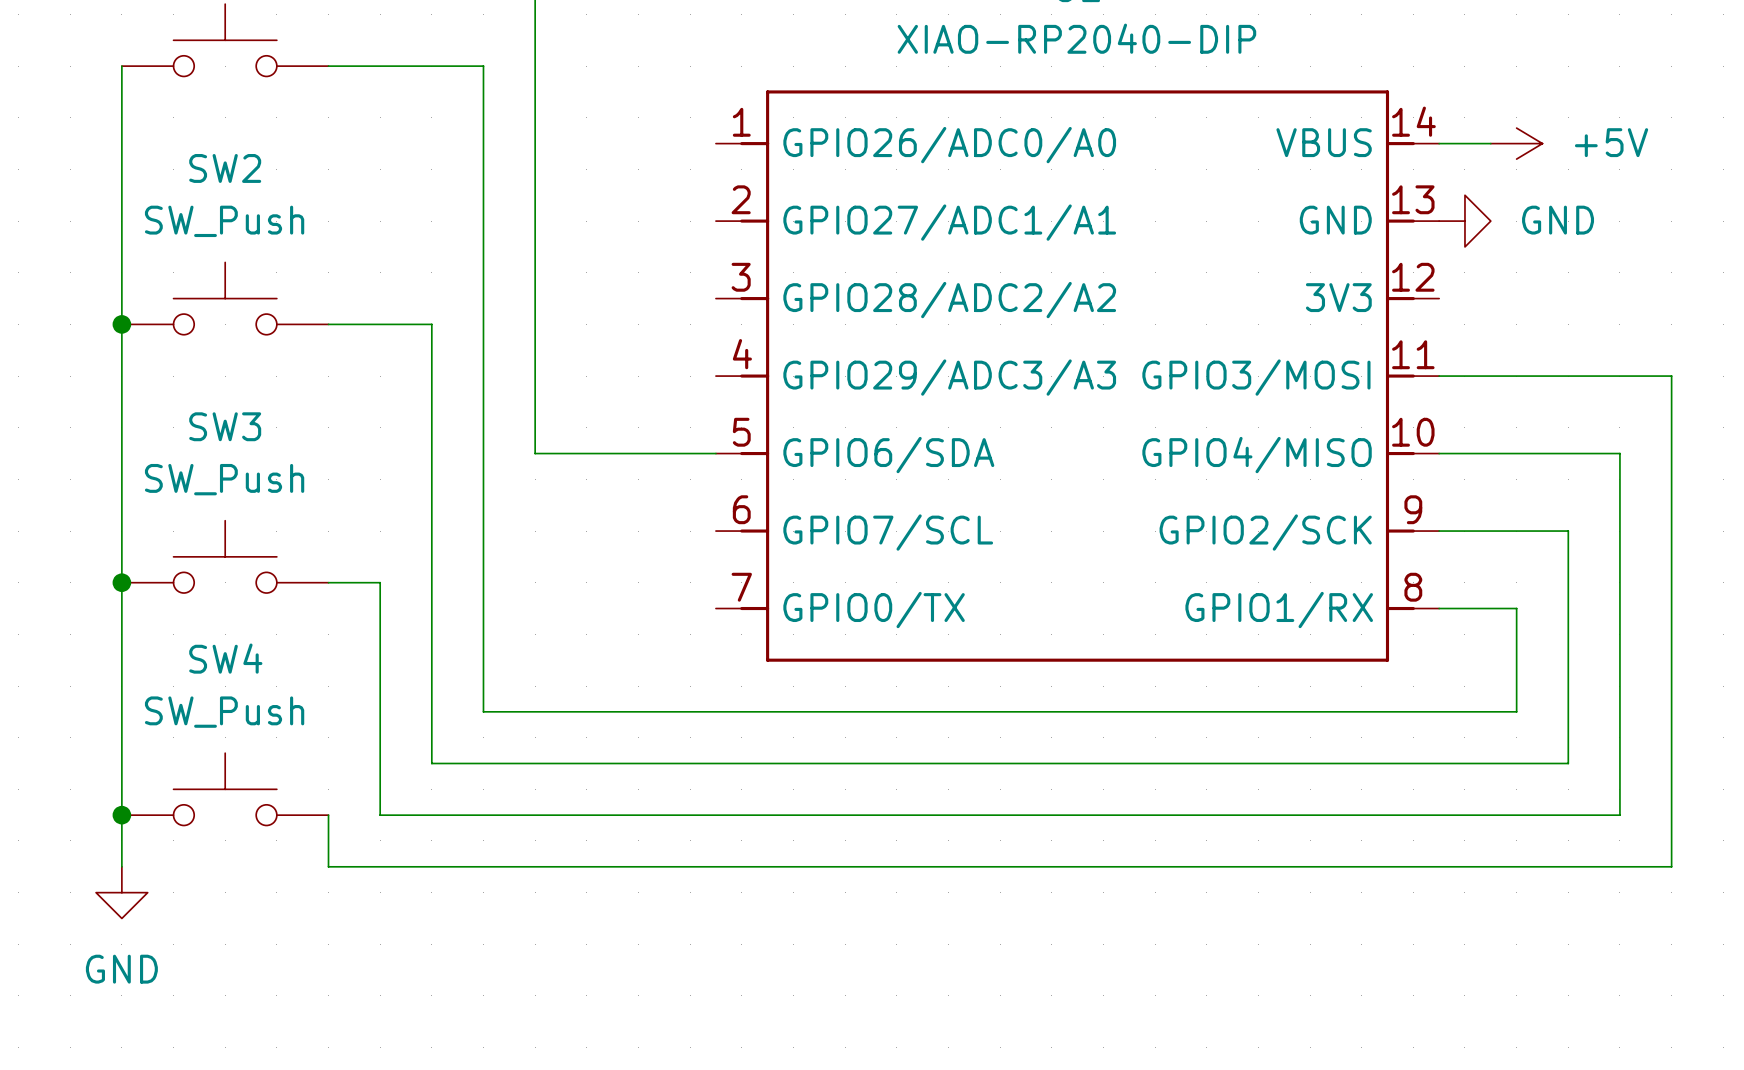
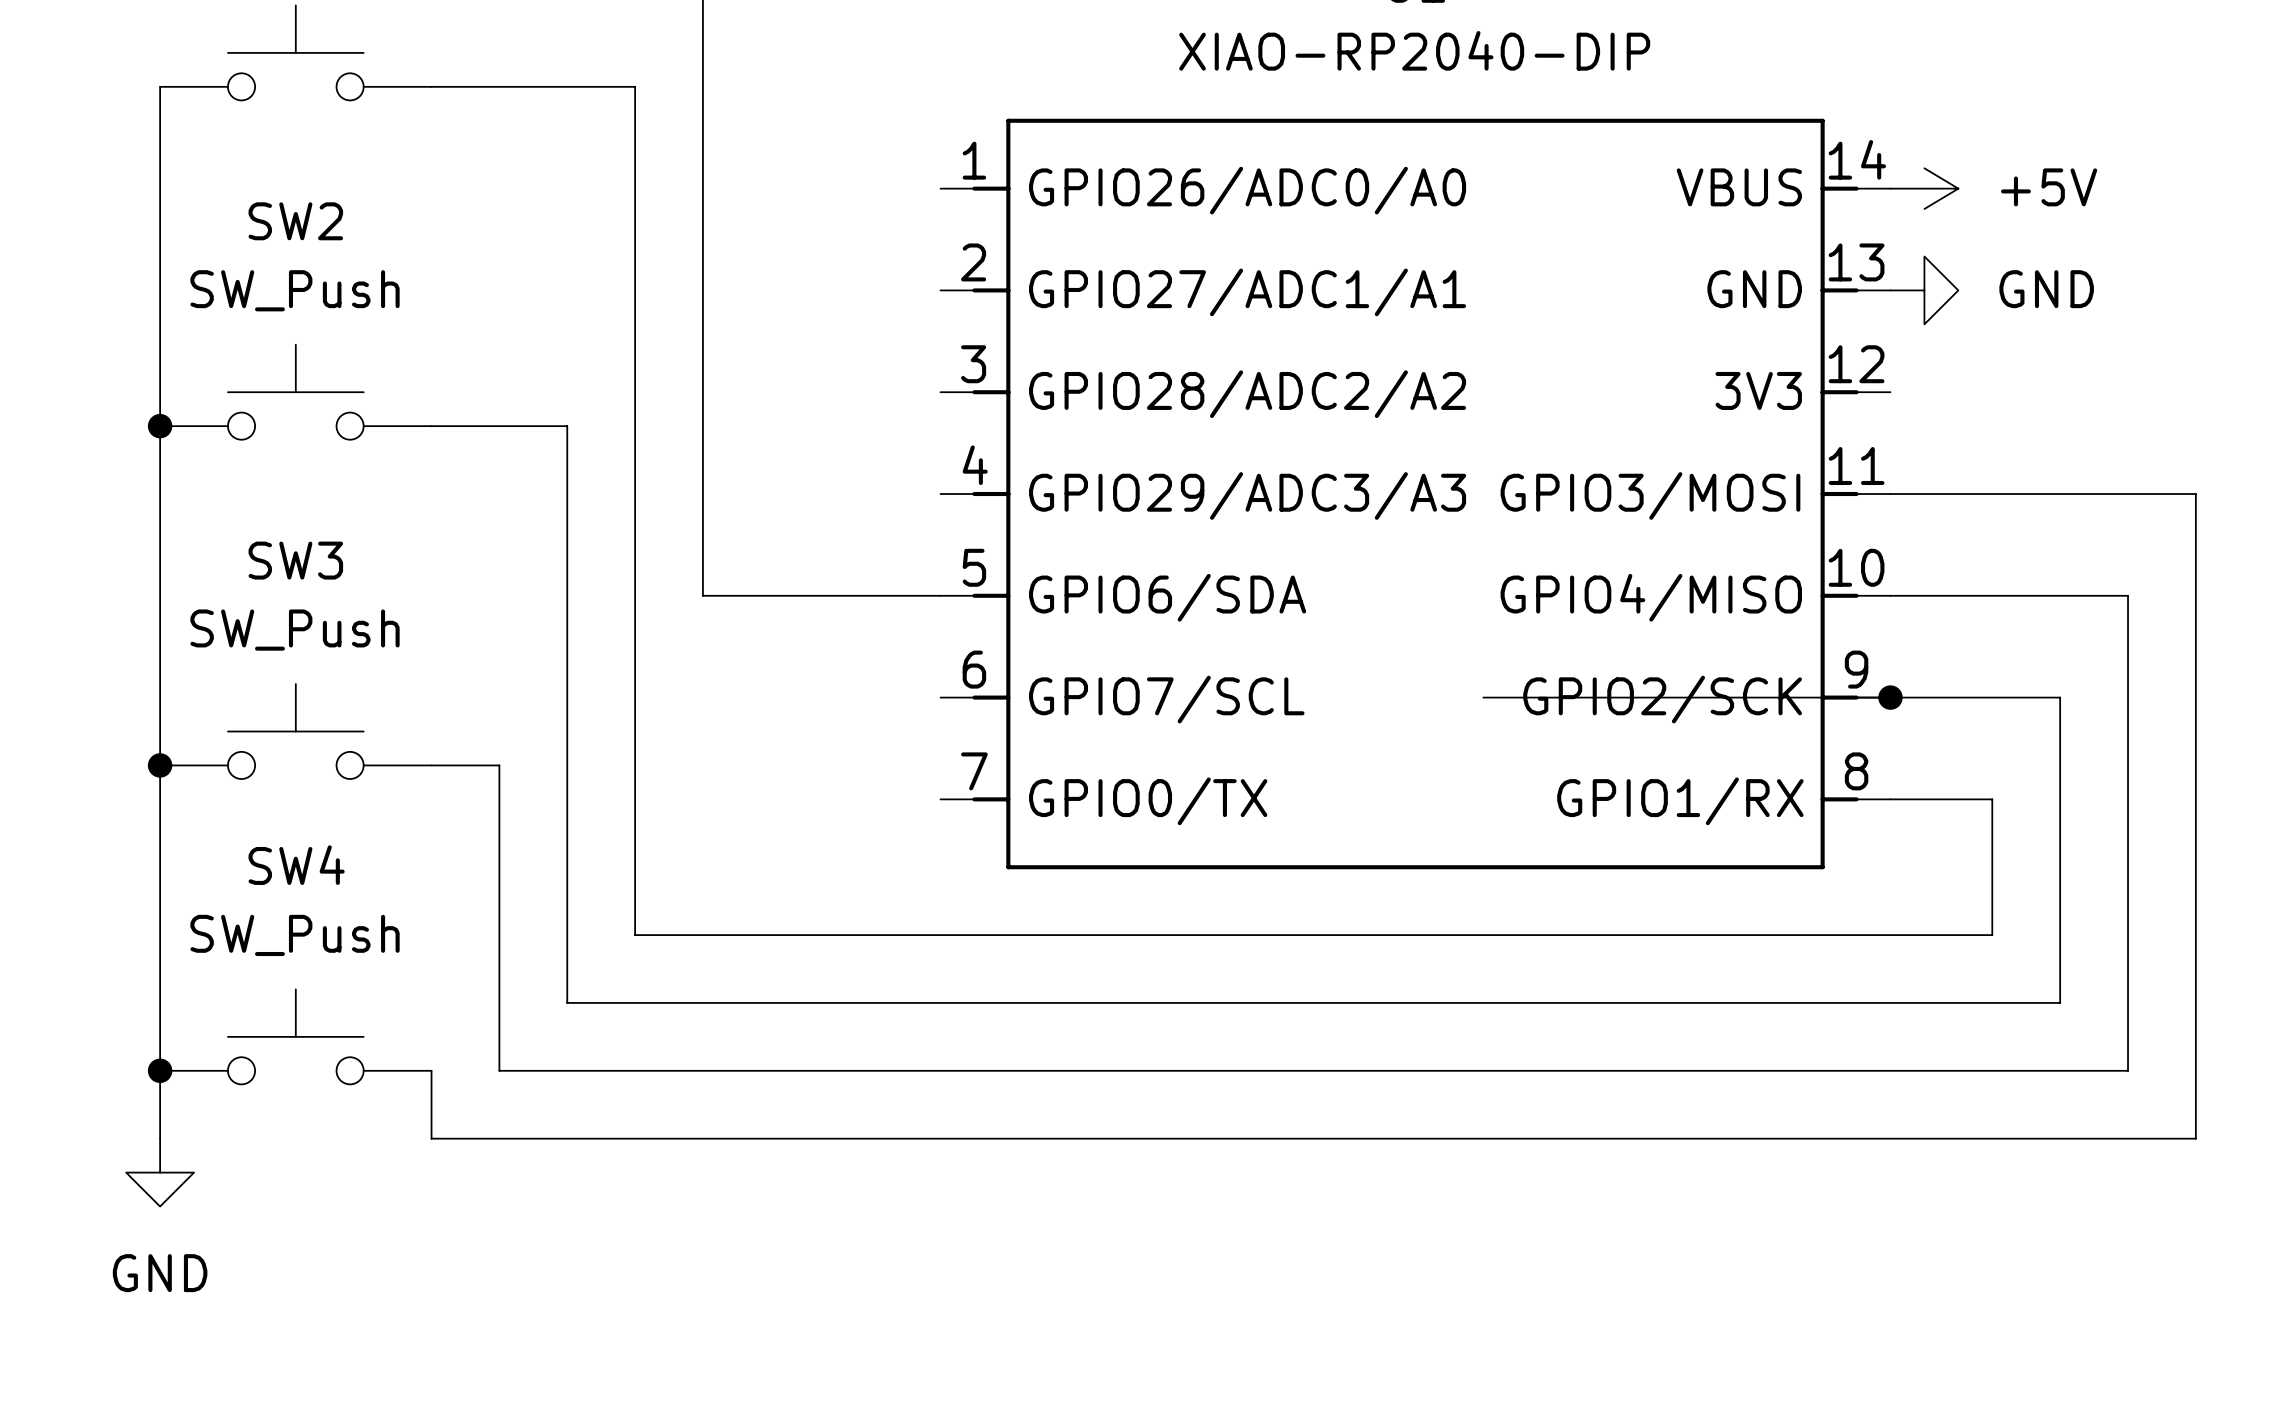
power symbol position: +5V (1516, 143) -> +5V (1924, 188)
wire: none -> (1483, 697) (1890, 697)
junction: none -> (1890, 697)

